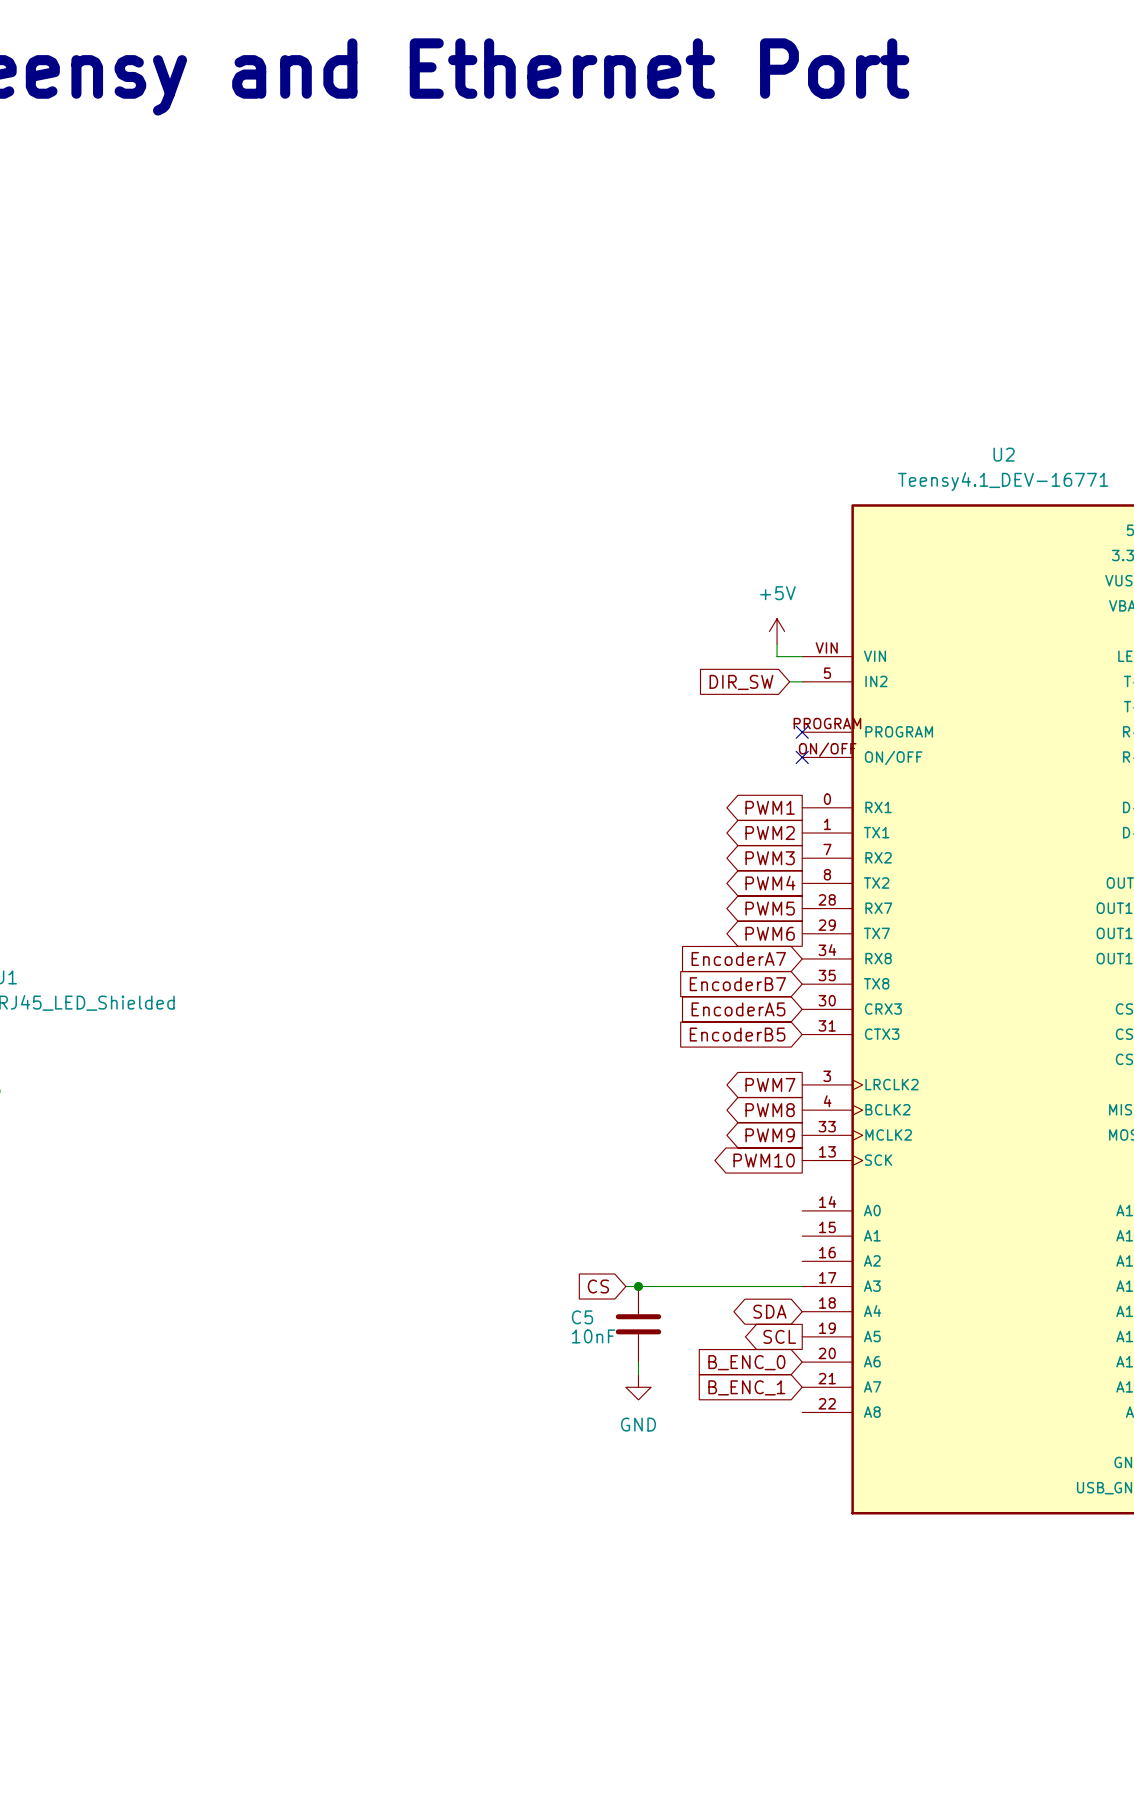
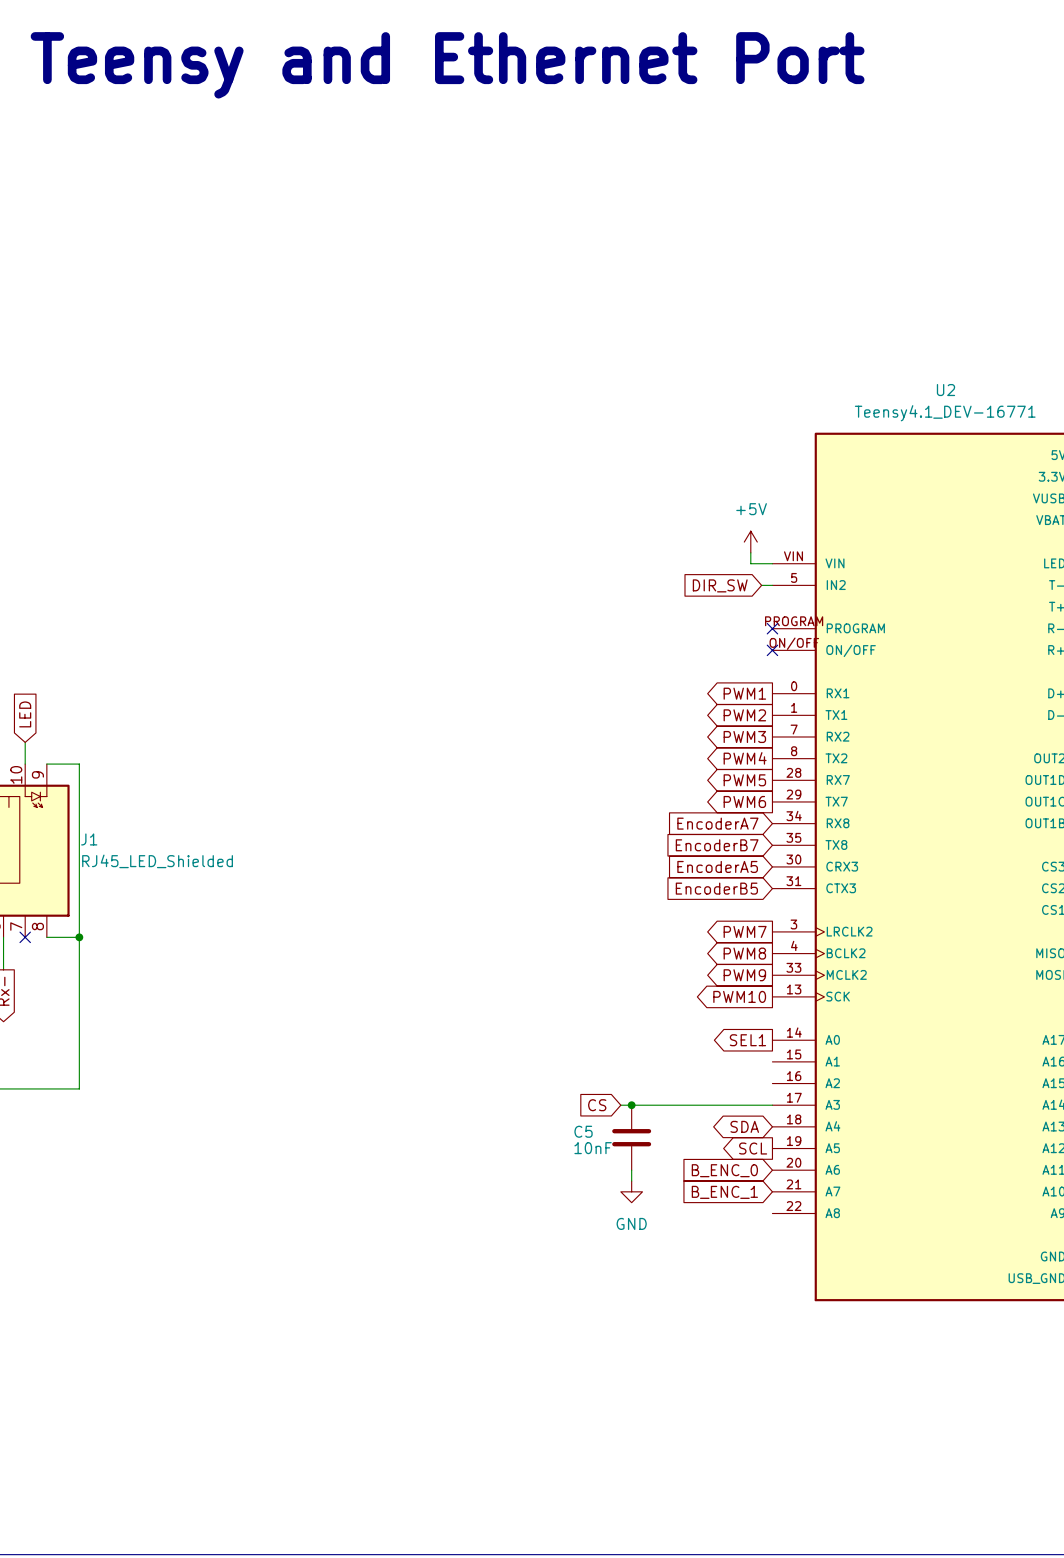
global label: none -> SEL1 (747, 1040)

